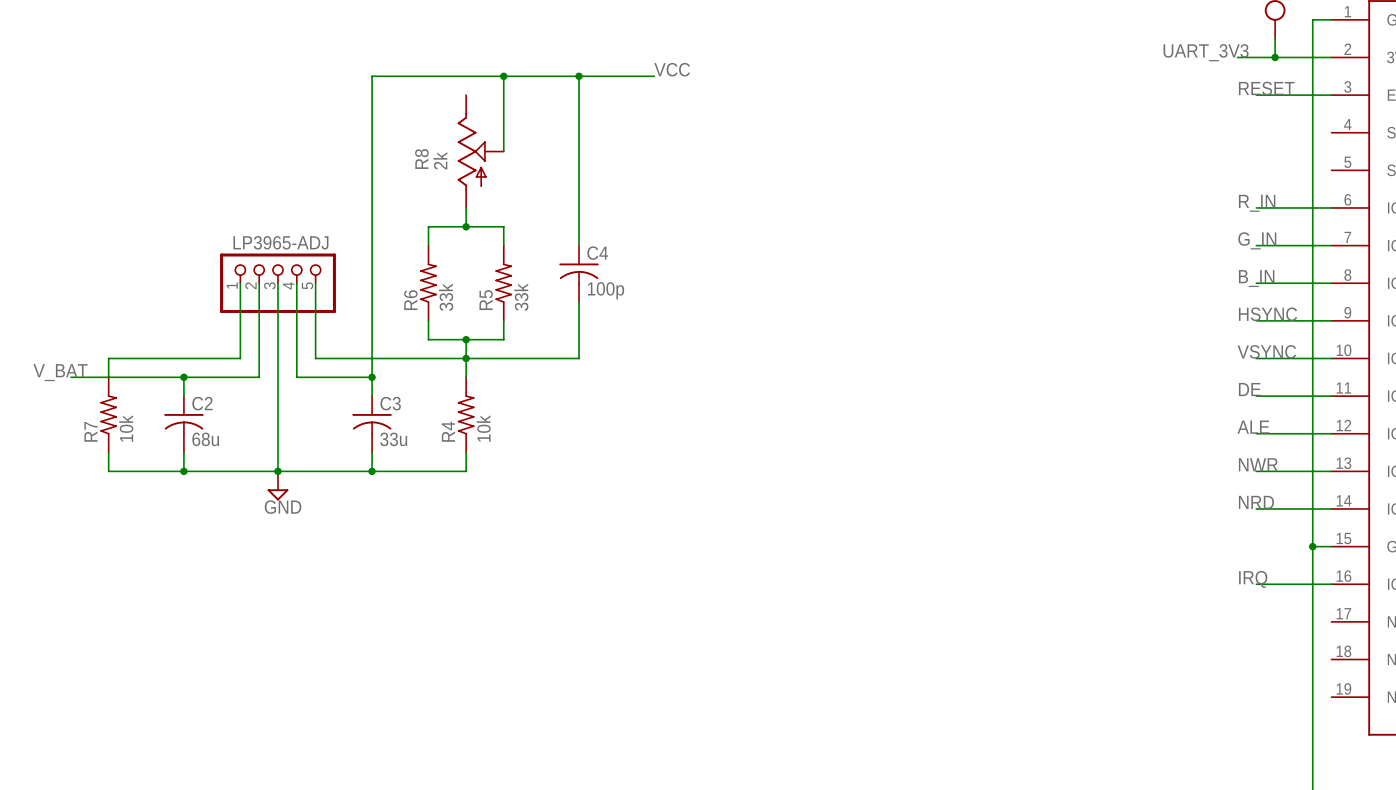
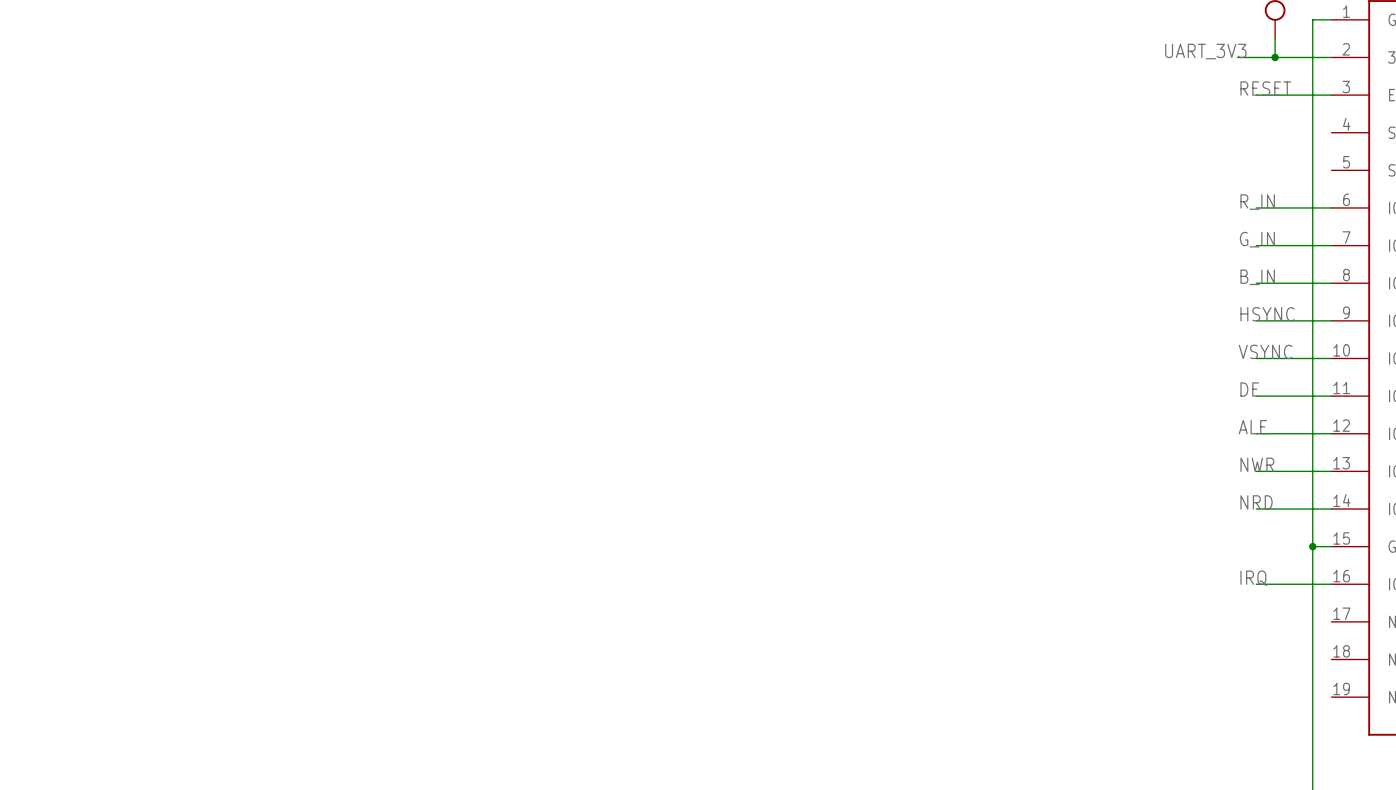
label: VCC (672, 69) -> none
wire: (503, 76) (503, 151) -> none
junction: (503, 76) -> none
wire: (579, 76) (579, 245) -> none
junction: (579, 76) -> none
wire: (654, 76) (372, 76) (372, 396) -> none
R8: 2k (480, 151) -> none
wire: (466, 207) (466, 226) -> none
junction: (466, 226) -> none
wire: (428, 245) (428, 226) (503, 226) (503, 245) -> none
C4: 100p (579, 273) -> none
wire: (240, 283) (240, 358) (108, 358) (108, 377) -> none
wire: (259, 283) (259, 377) (71, 377) -> none
wire: (277, 283) (277, 471) -> none
LP3965-ADJ: (277, 283) -> none
wire: (296, 283) (296, 377) (372, 377) -> none
wire: (315, 283) (315, 358) (579, 358) (579, 302) -> none
R6: 33k (428, 283) -> none
R5: 33k (503, 283) -> none
wire: (428, 320) (428, 339) (503, 339) (503, 320) -> none
wire: (466, 339) (466, 377) -> none
junction: (466, 339) -> none
junction: (466, 358) -> none
label: V_BAT (60, 372) -> none
wire: (183, 377) (183, 396) -> none
junction: (183, 377) -> none
junction: (372, 377) -> none
R7: 10k (108, 414) -> none
R4: 10k (466, 414) -> none
C2: 68u (183, 424) -> none
C3: 33u (372, 424) -> none
wire: (108, 452) (108, 471) (466, 471) (466, 452) -> none
wire: (183, 452) (183, 471) -> none
wire: (372, 452) (372, 471) -> none
junction: (183, 471) -> none
junction: (277, 471) -> none
junction: (372, 471) -> none
power symbol: GND (277, 485) -> none

